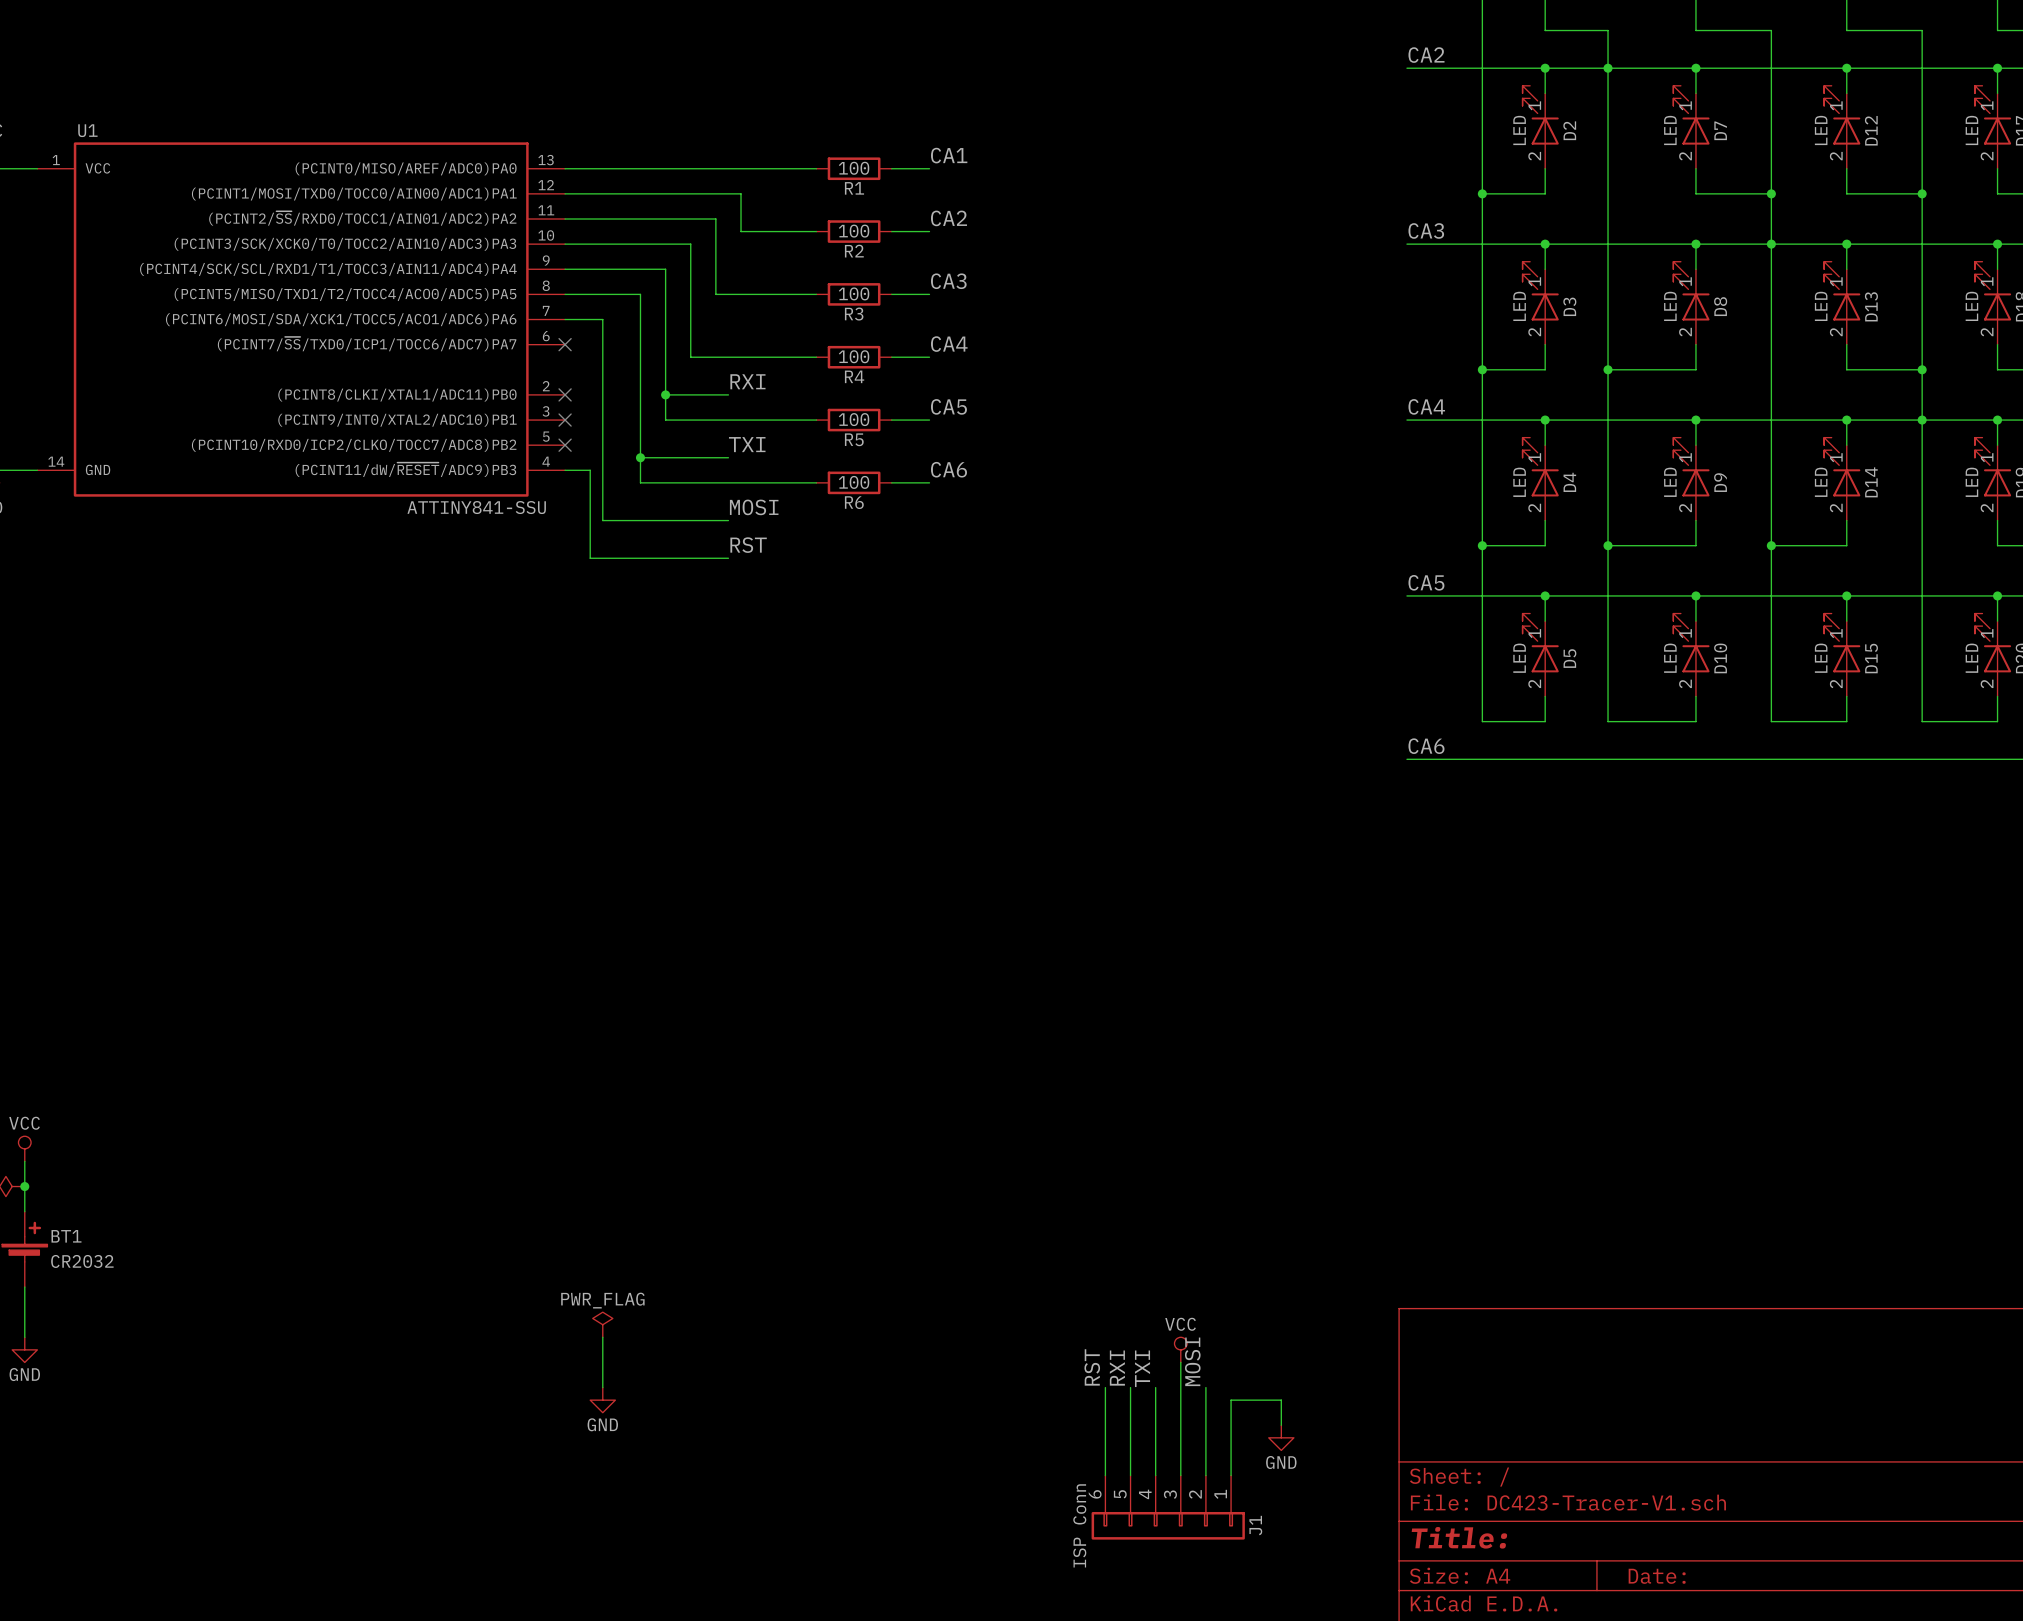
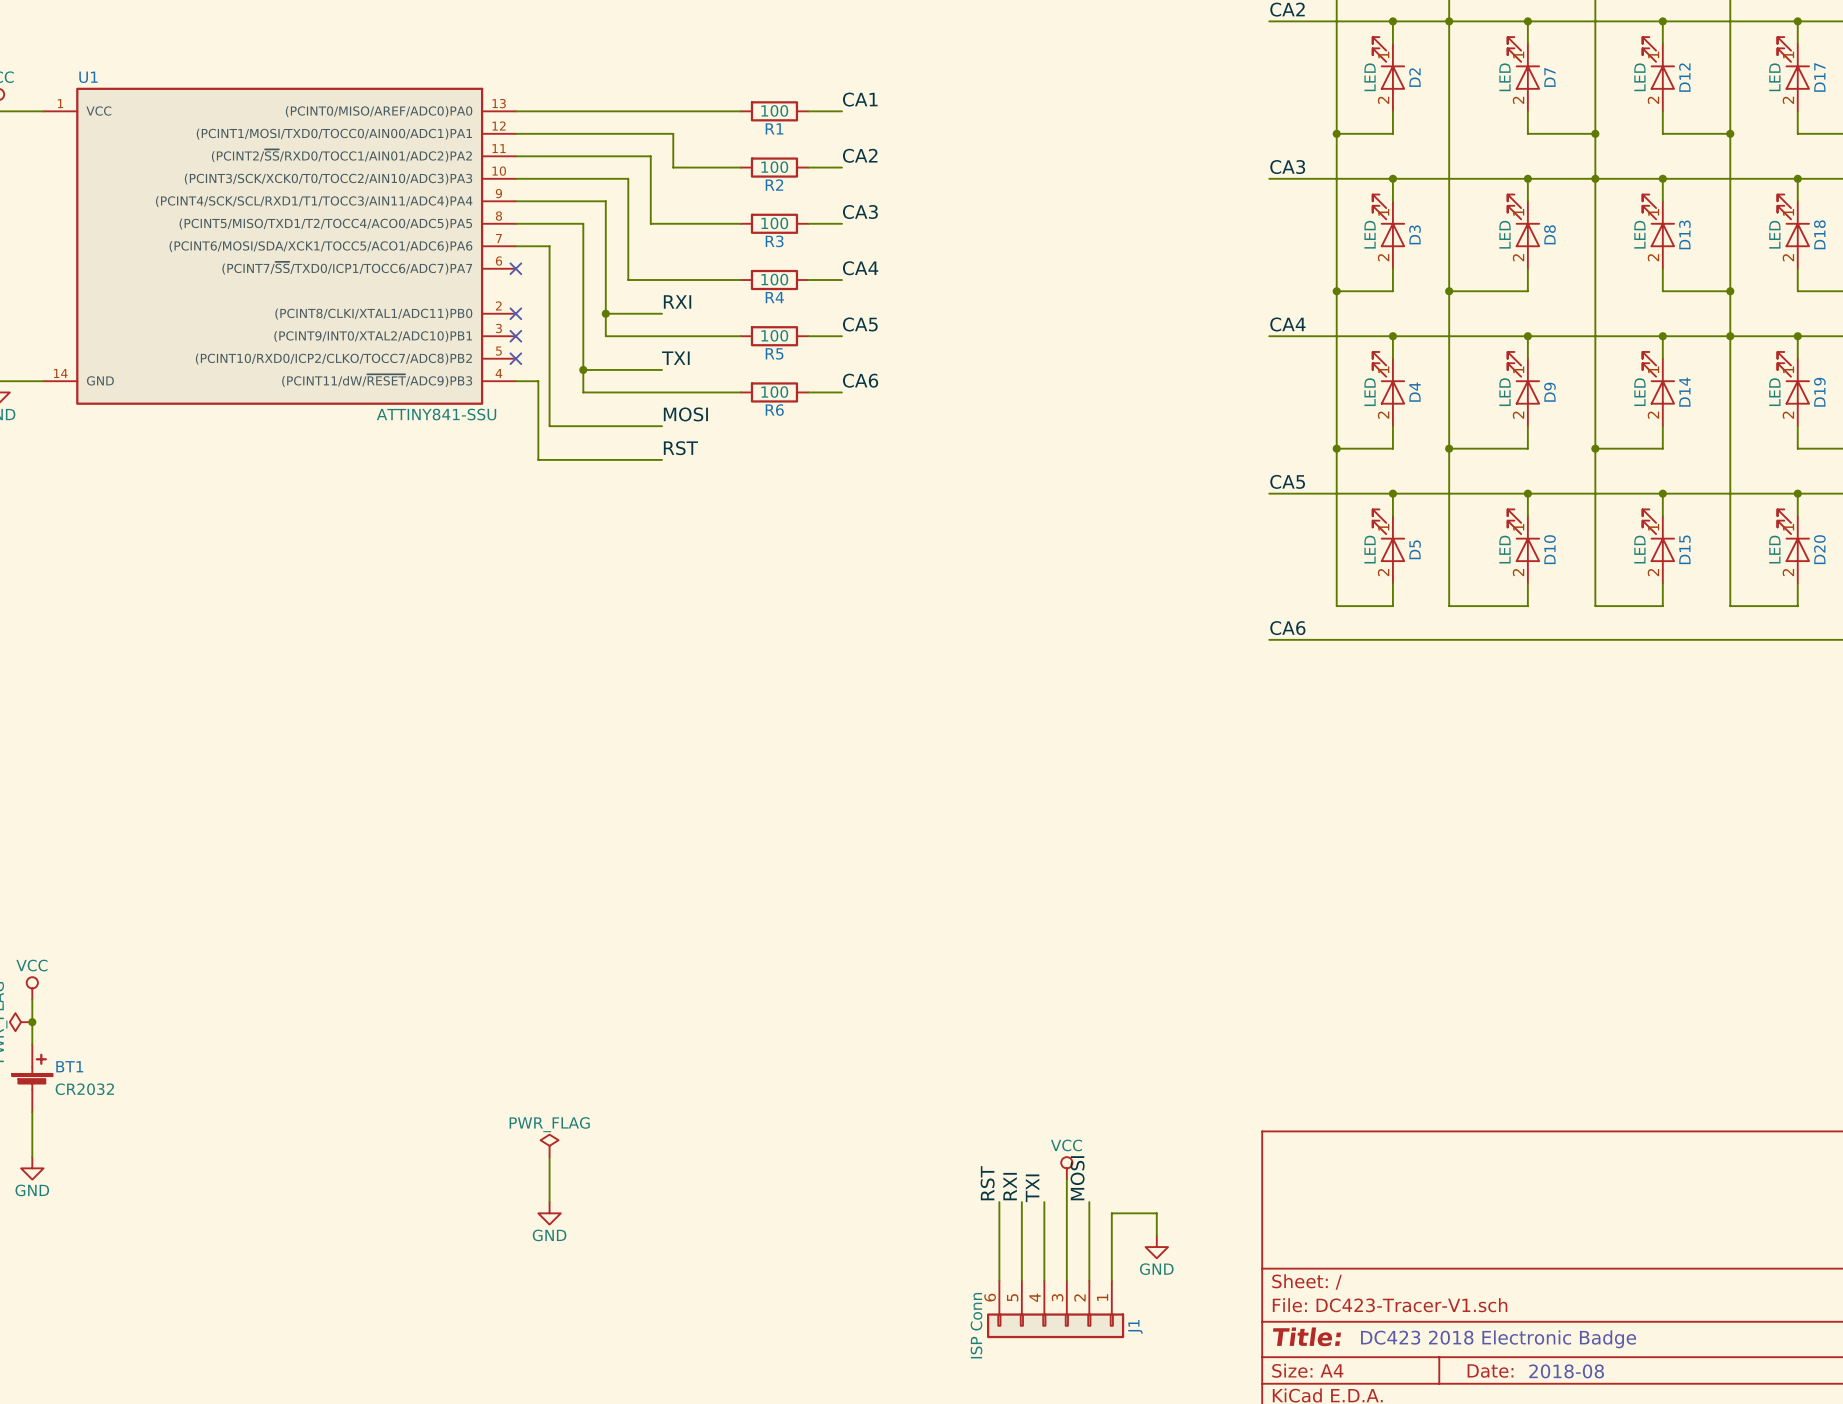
text: none -> DC423 2018 Electronic Badge (1498, 1339)
text: none -> 2018-08 (1566, 1371)

